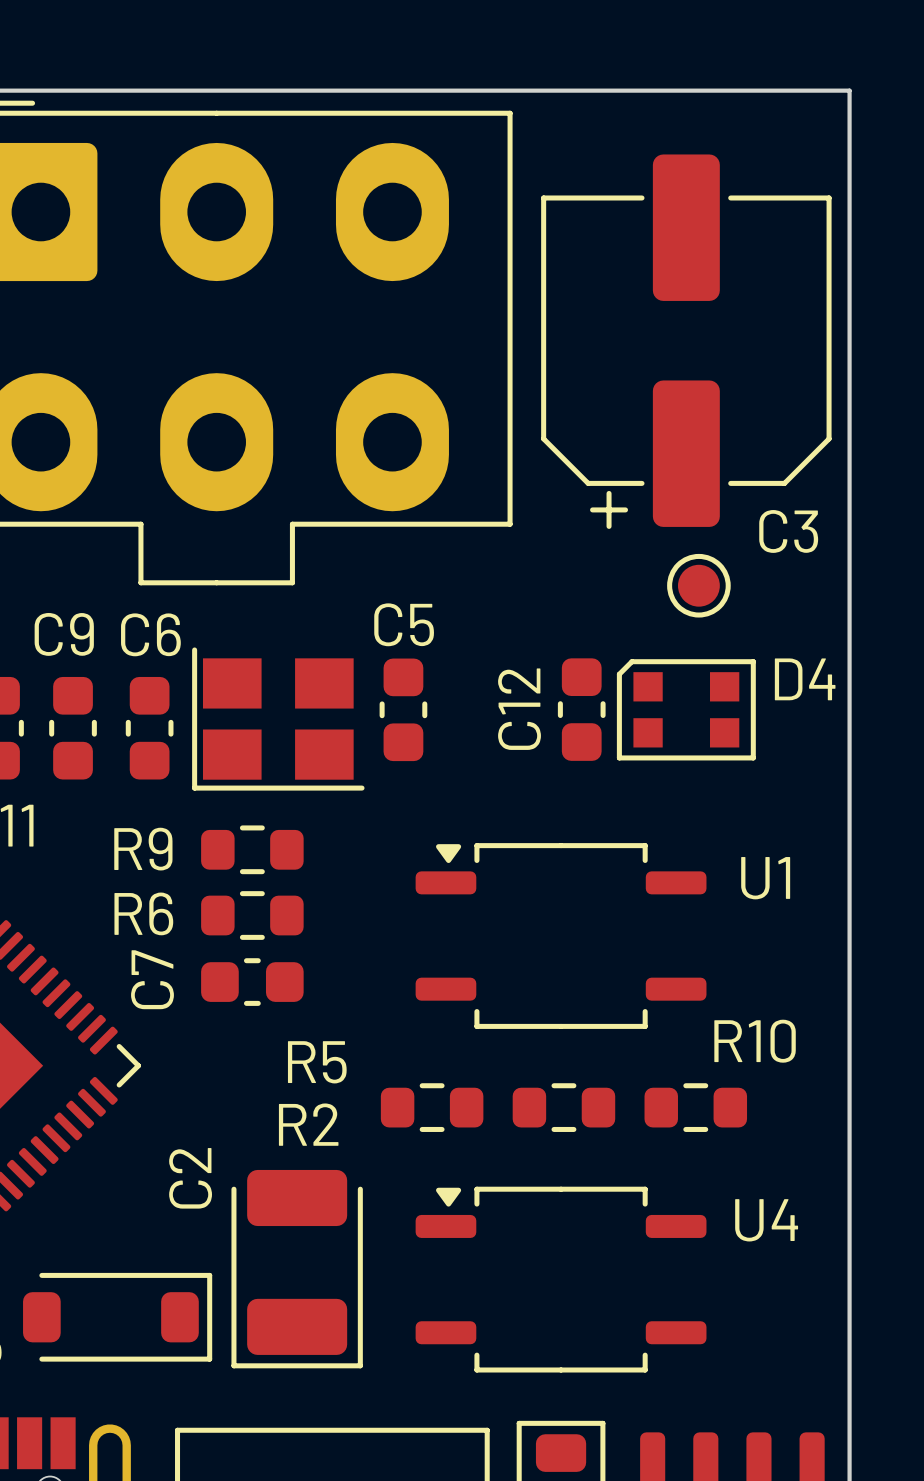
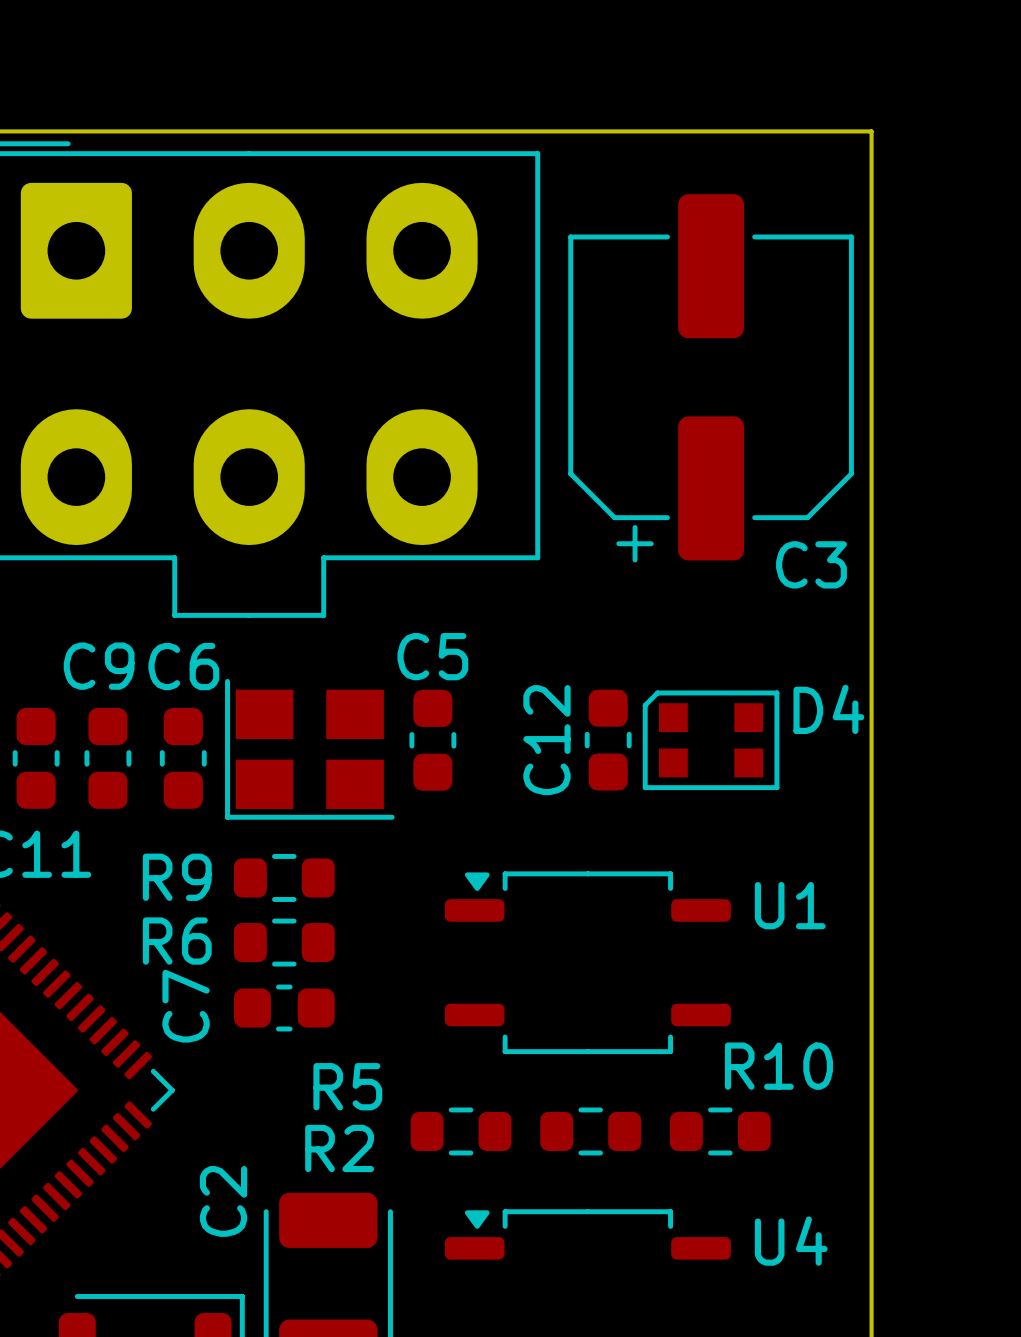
part: (698, 585) -> none

